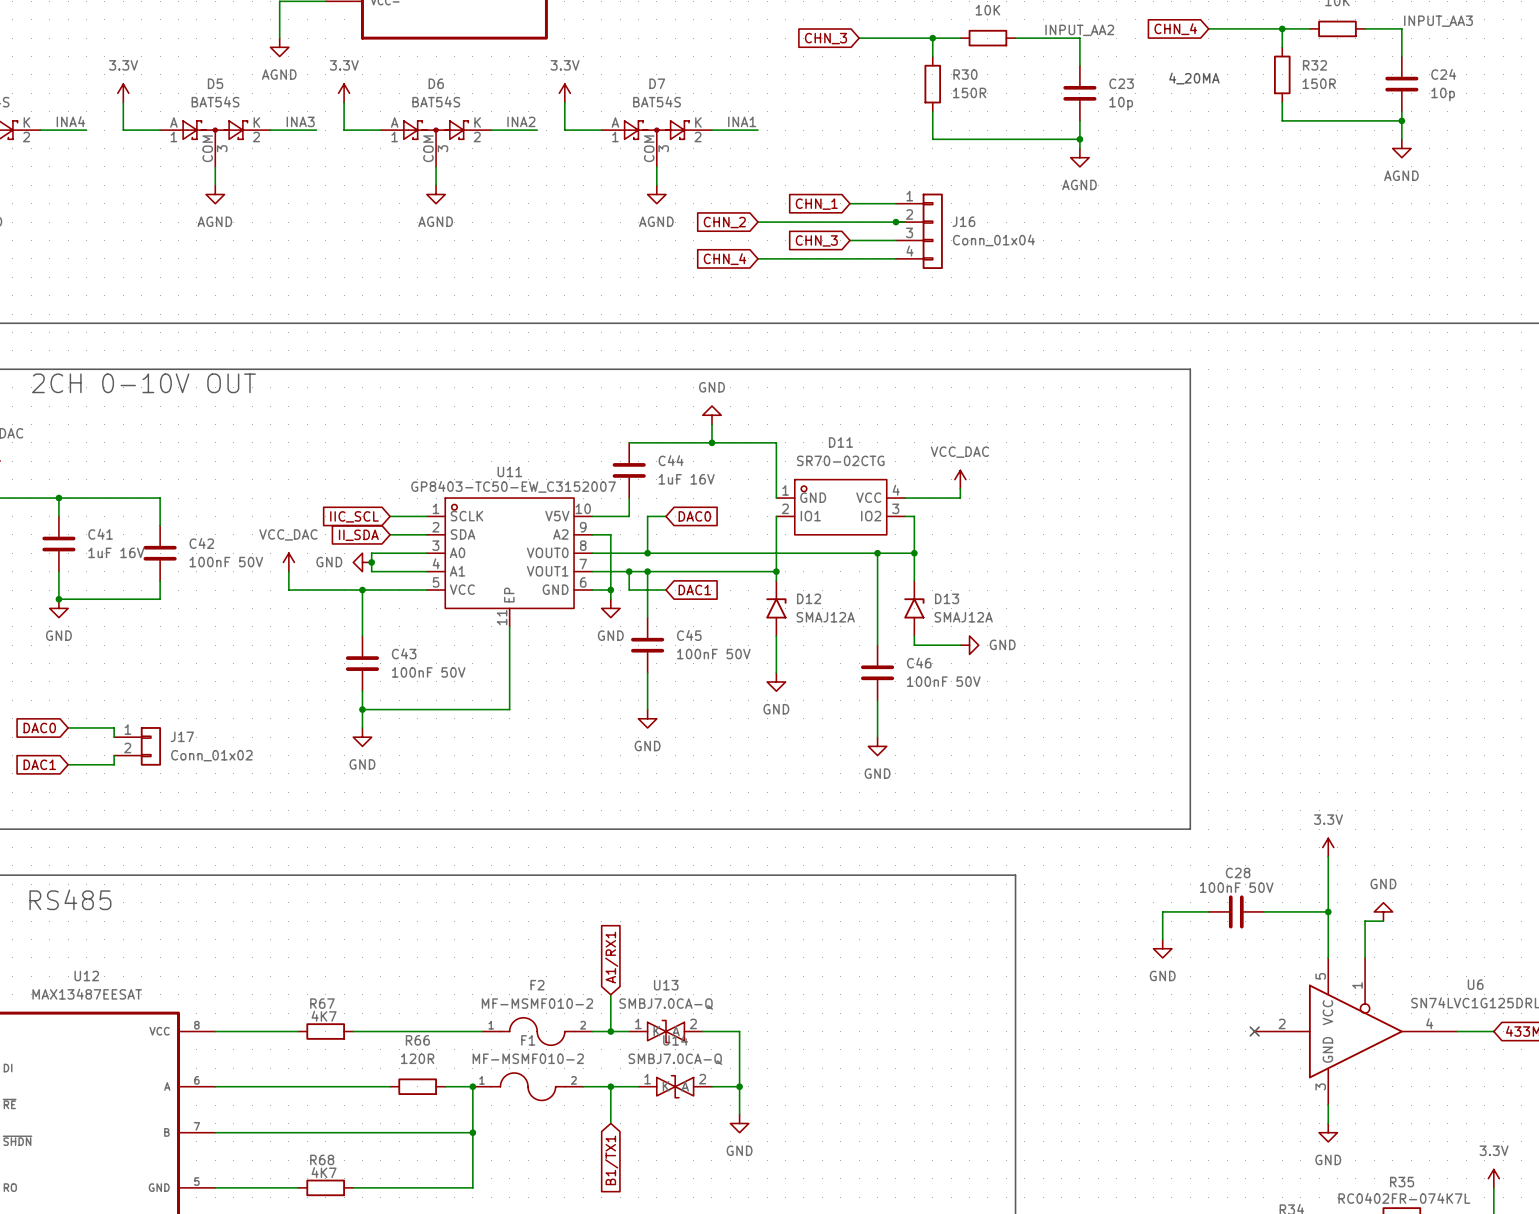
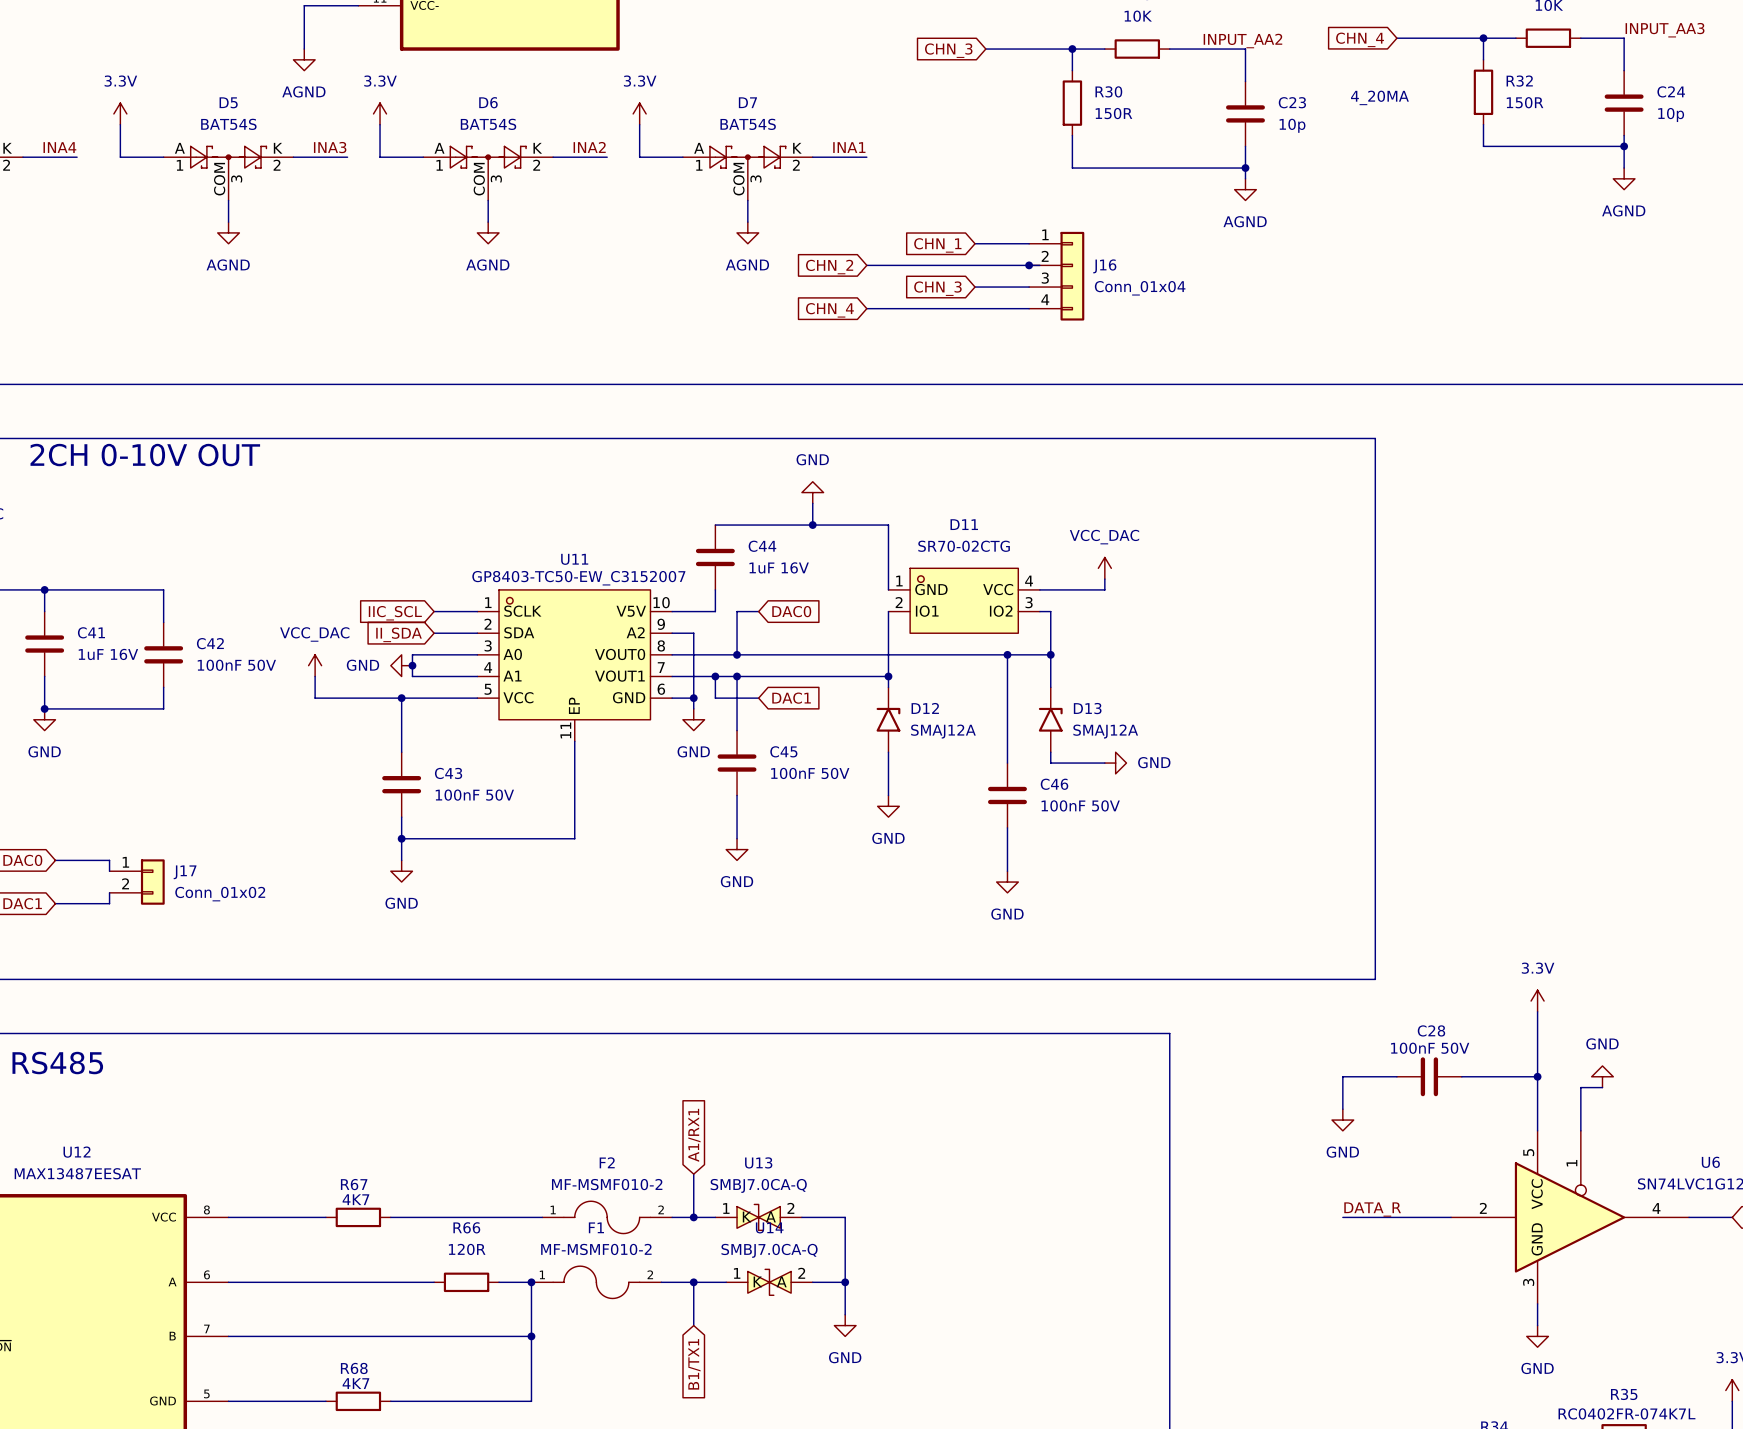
label: none -> DATA_R (1372, 1209)
wire: none -> (1342, 1217) (1451, 1217)
no-connect mark: (1254, 1031) -> none

